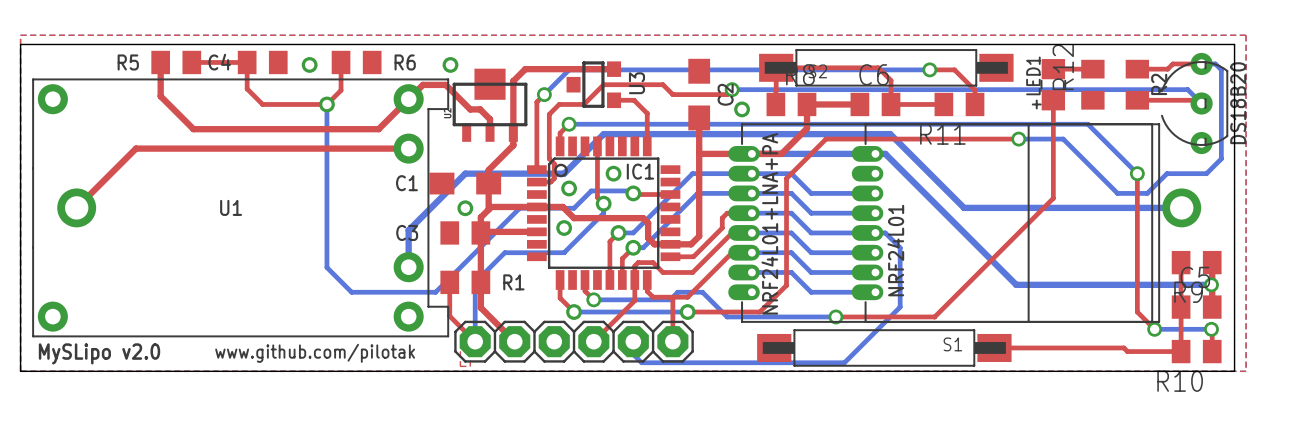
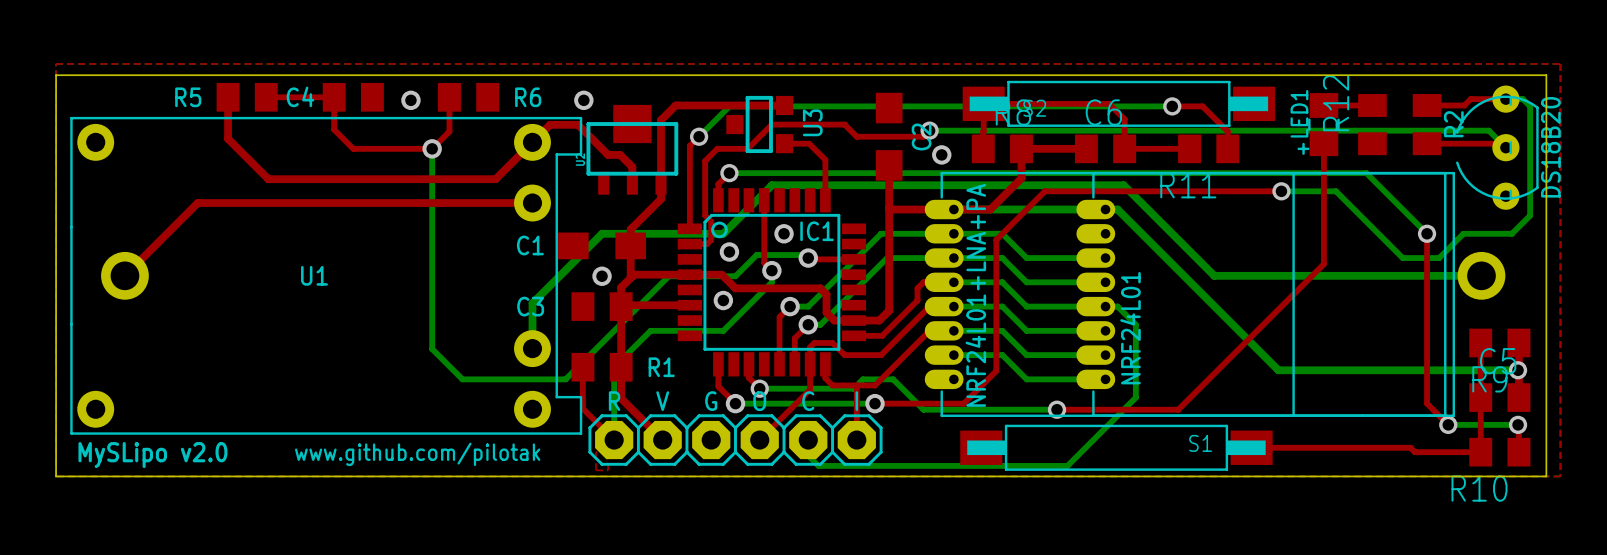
text: none -> R (614, 401)
text: none -> V (662, 401)
text: none -> G (711, 401)
text: none -> O (759, 401)
text: none -> C (808, 401)
text: none -> I (856, 401)

